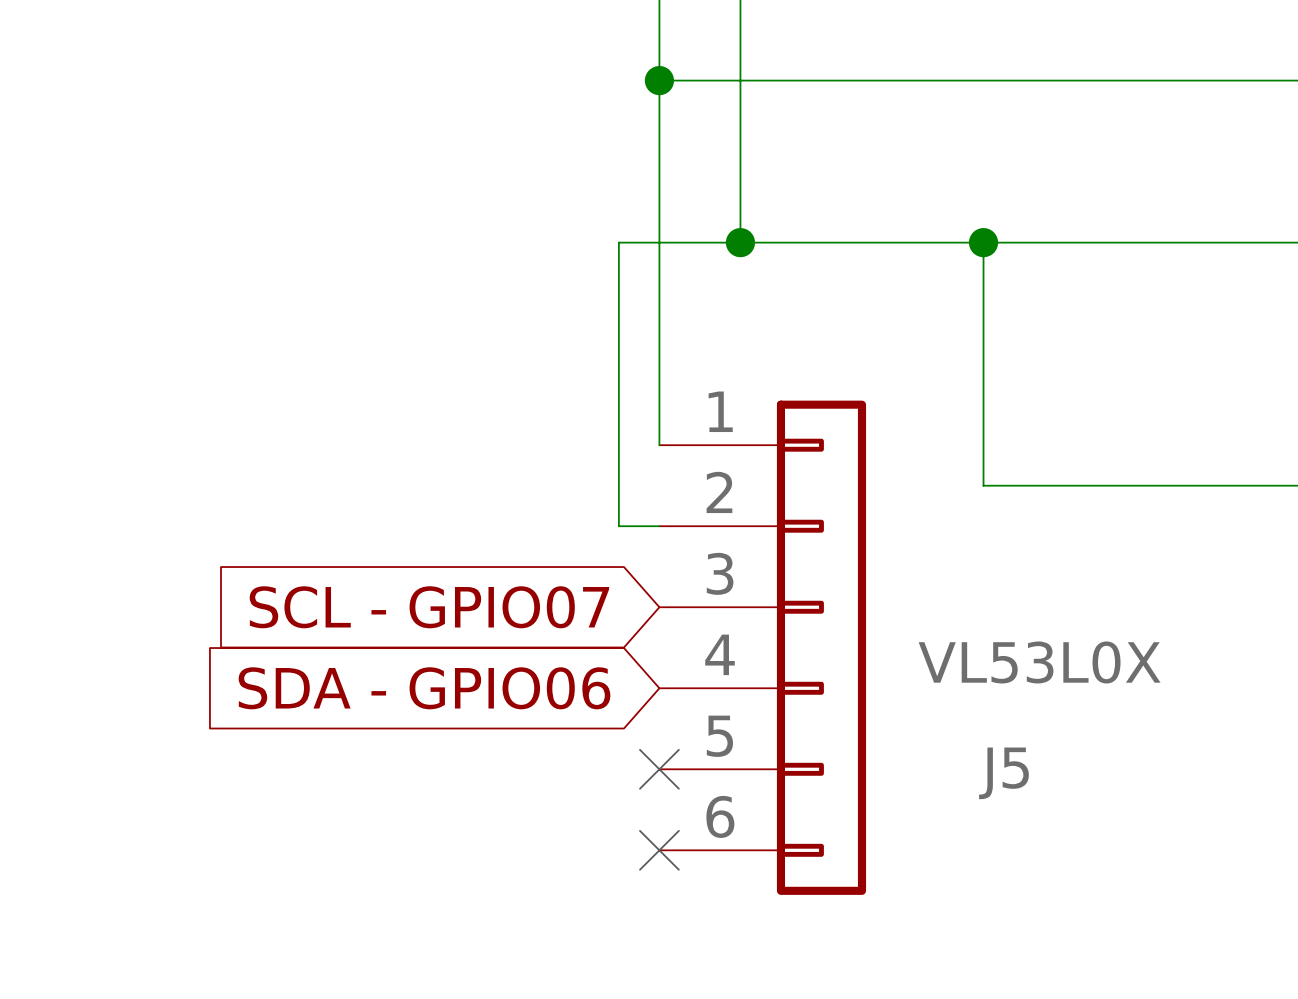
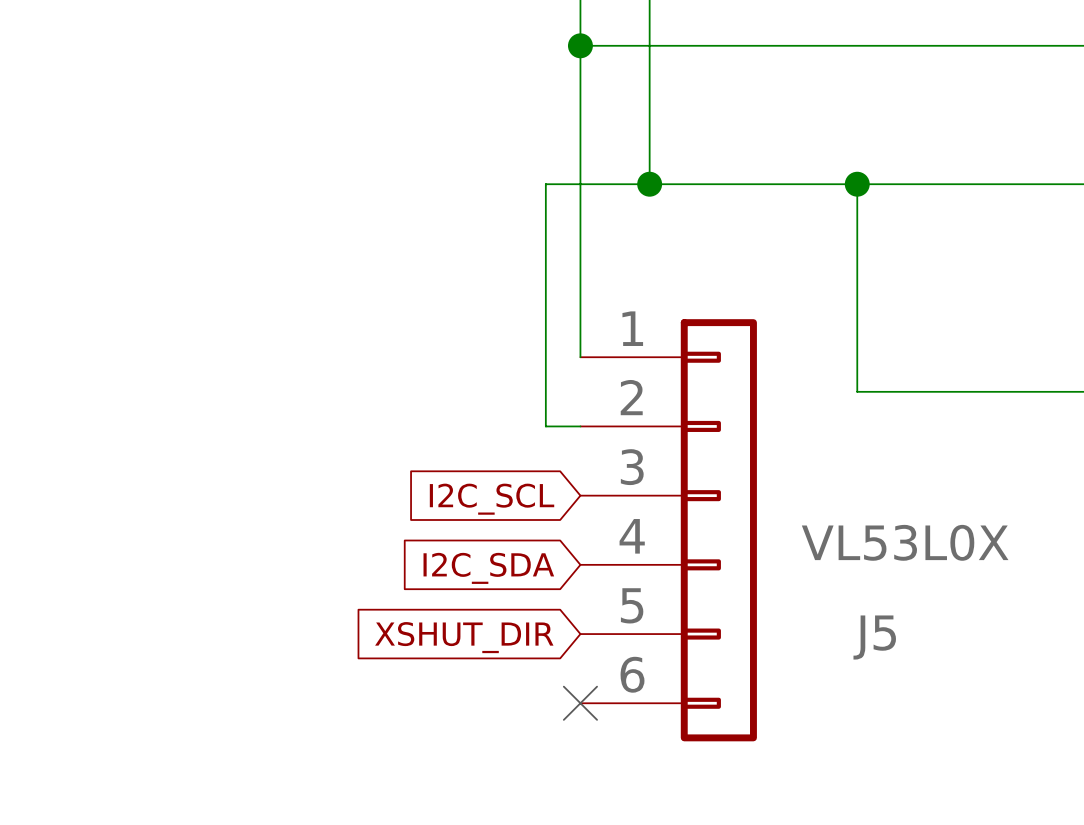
global label: SCL - GPIO07 (429, 607) -> I2C_SCL (492, 499)
global label: SDA - GPIO06 (424, 688) -> I2C_SDA (488, 568)
no-connect mark: (659, 769) -> none
global label: none -> XSHUT_DIR (464, 637)

